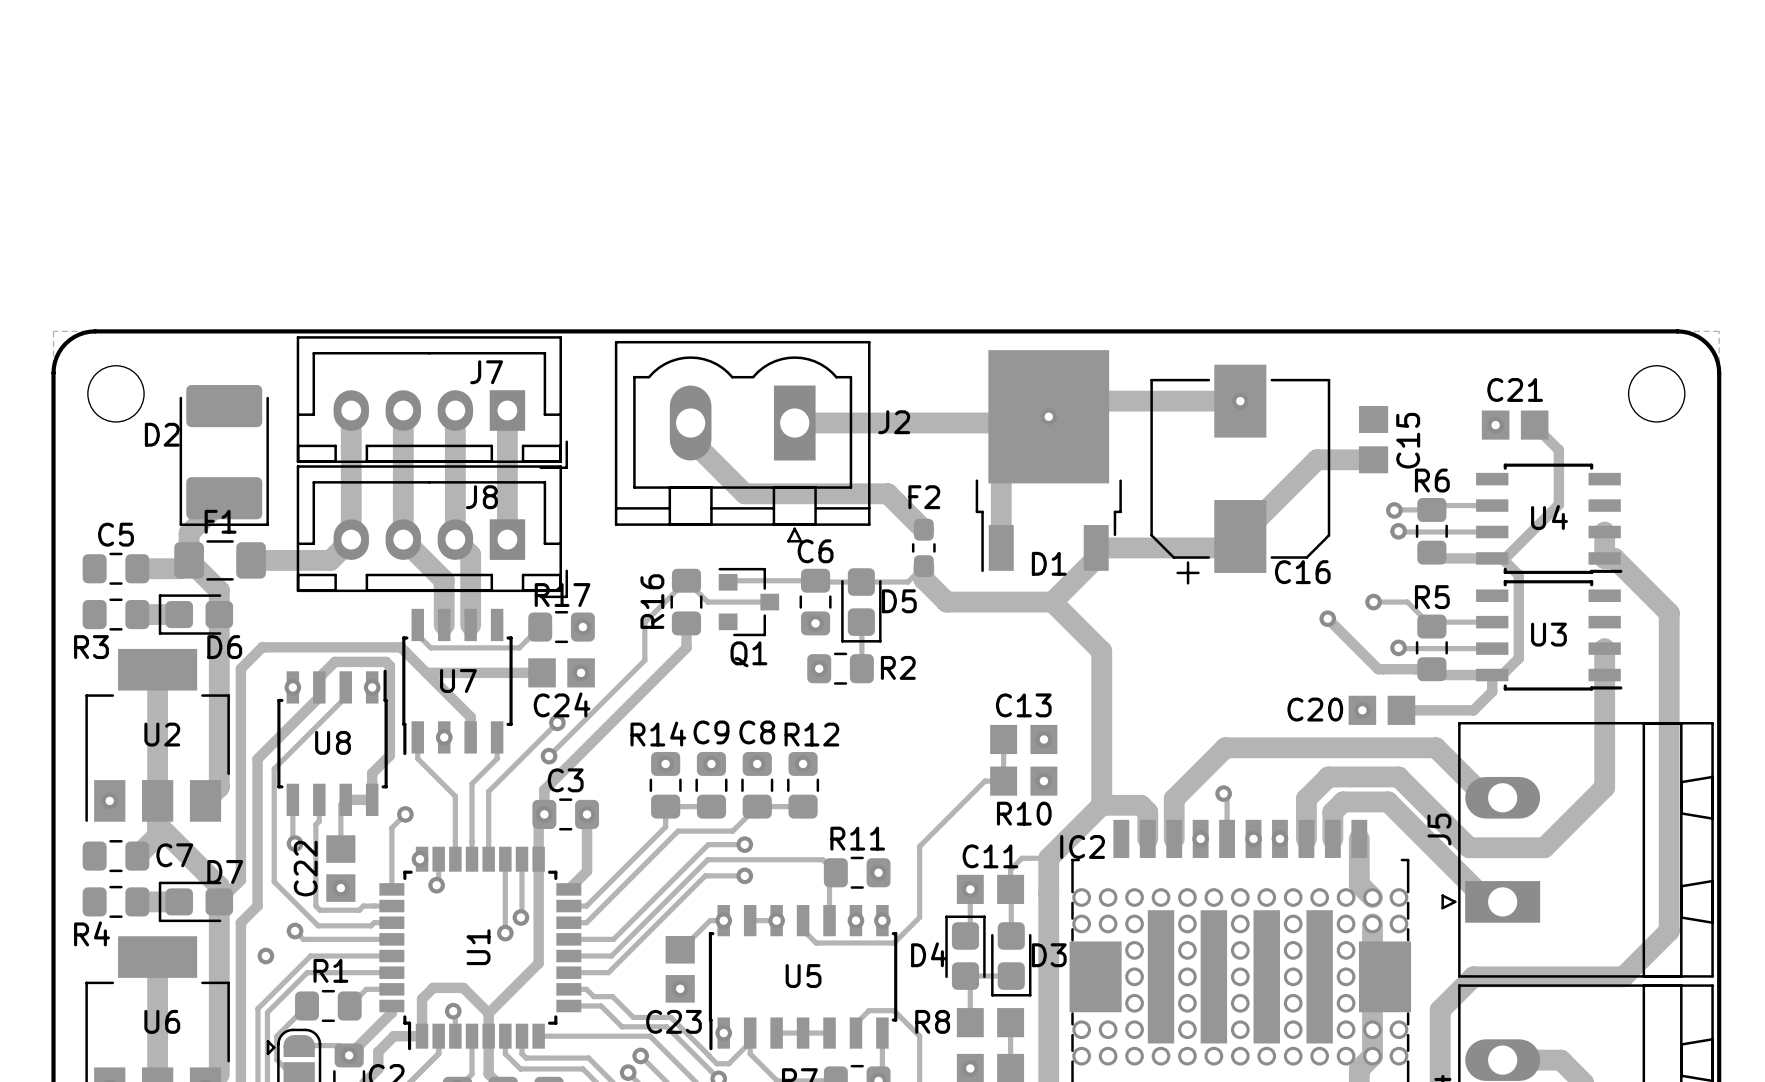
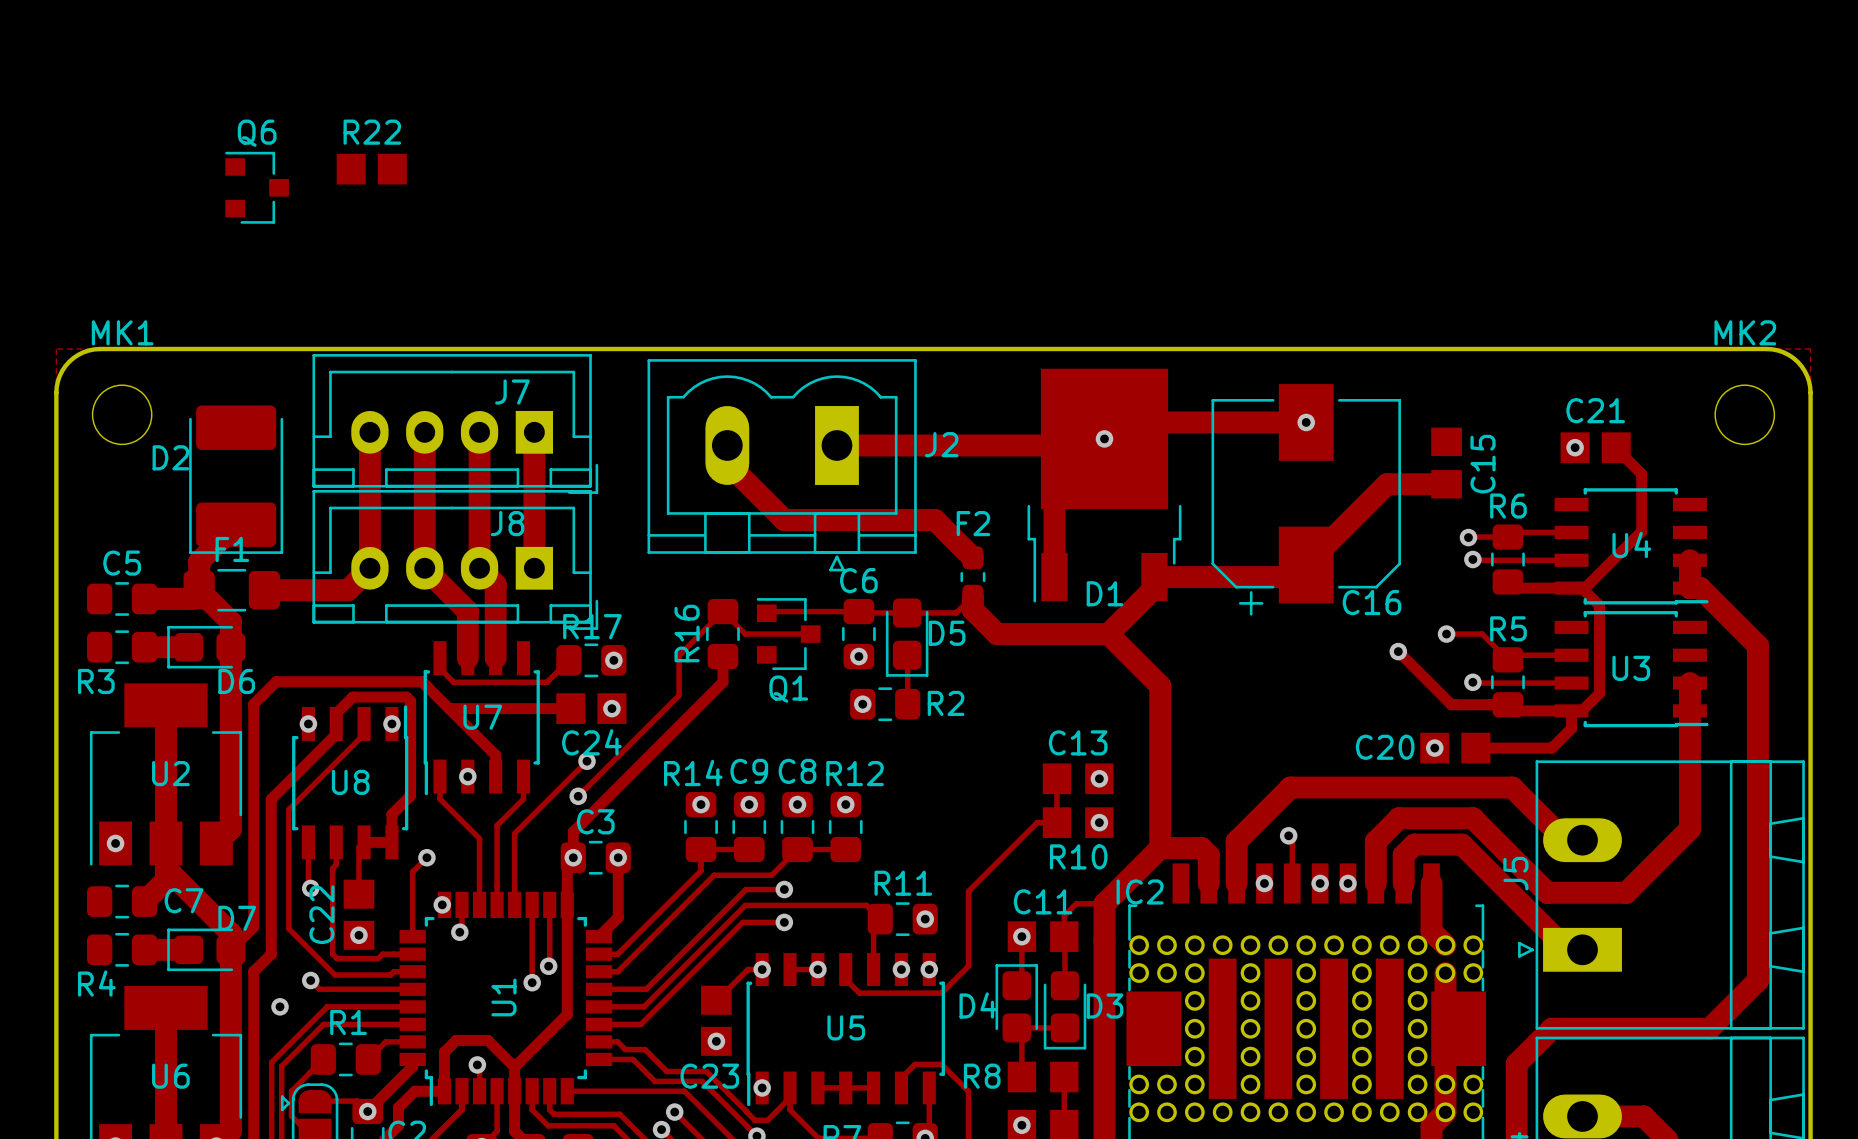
R22: none -> (371, 169)
Q6: none -> (257, 187)
MK1 name: none -> MK1 (122, 332)
MK2 name: none -> MK2 (1745, 332)

